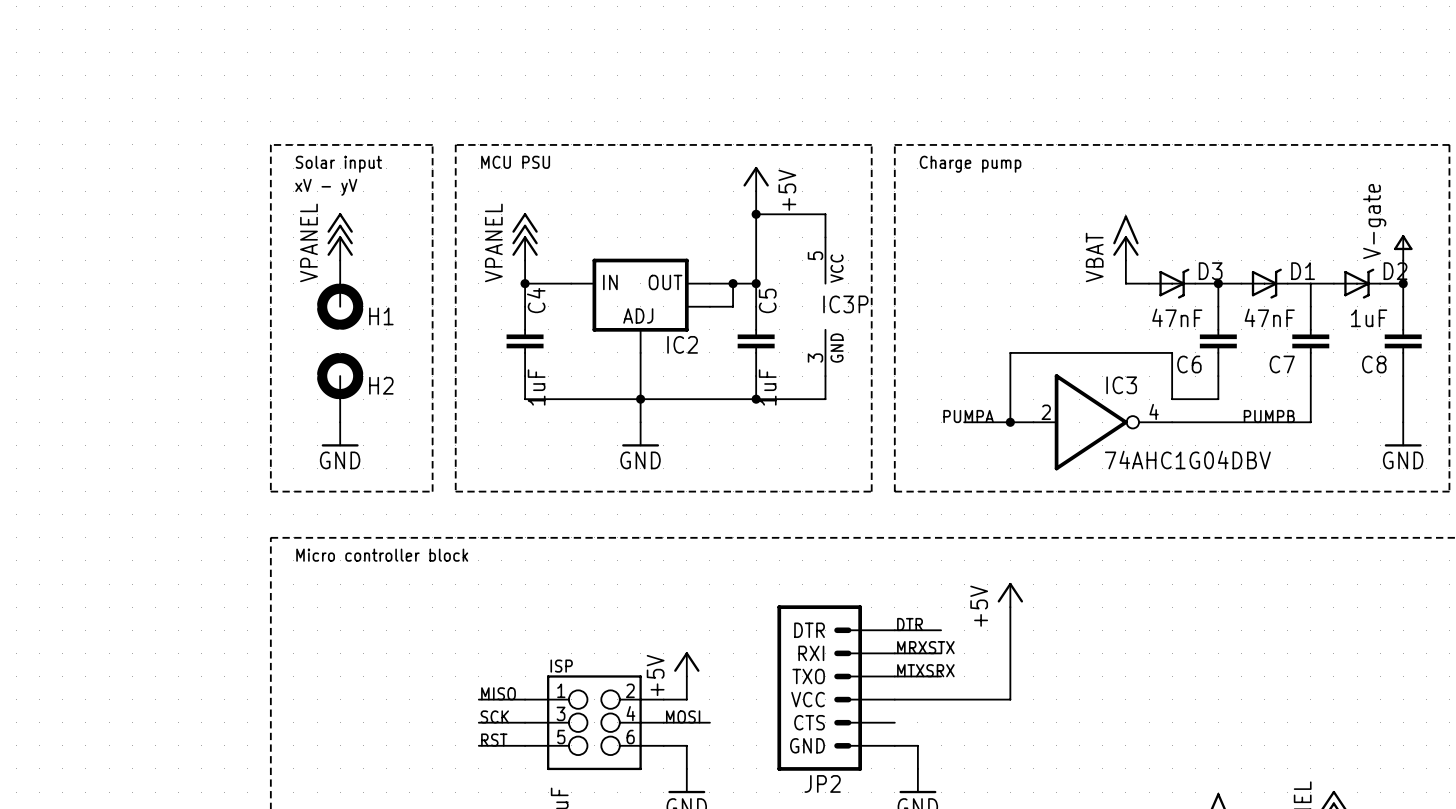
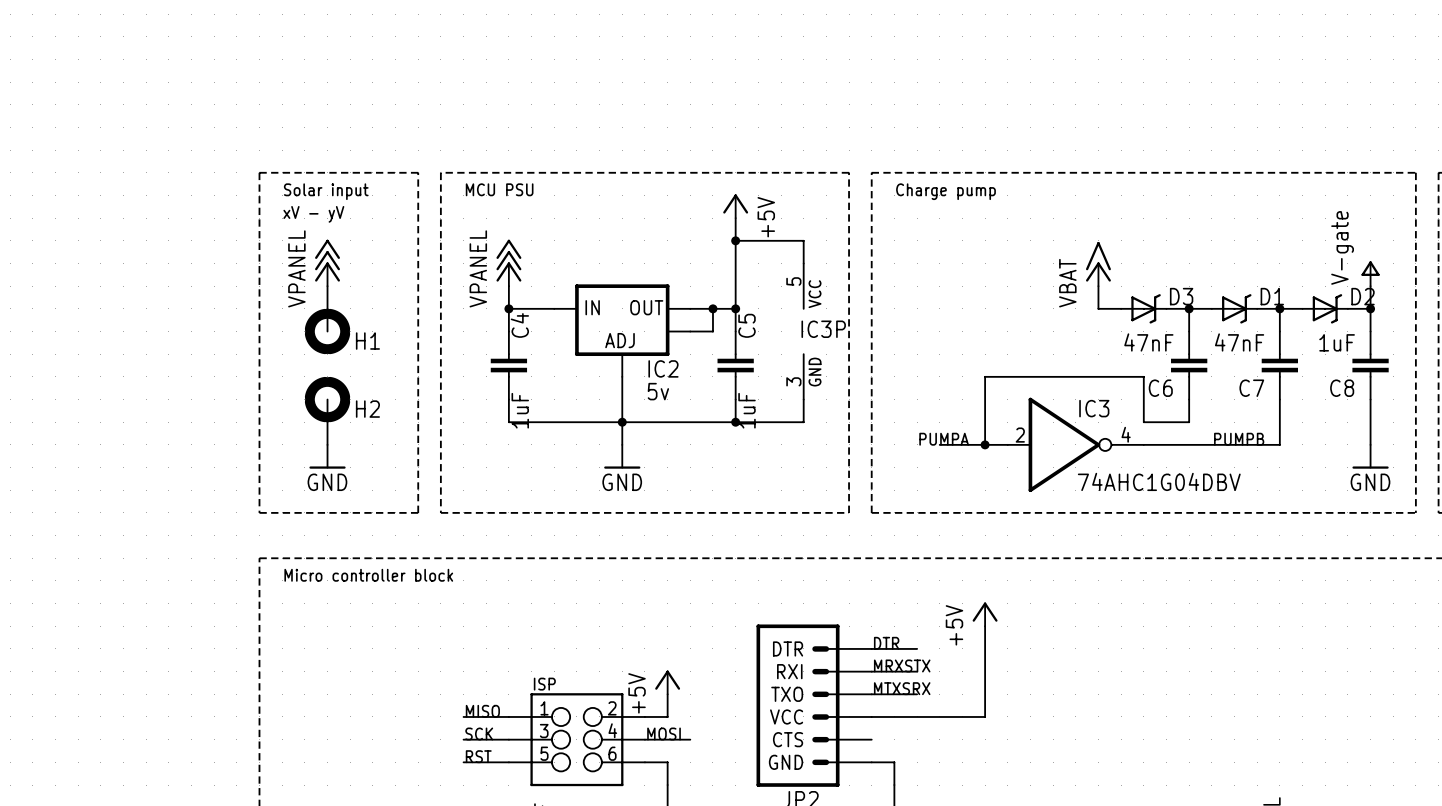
junction: none -> (1279, 308)
IC2 value: none -> 5v (658, 391)

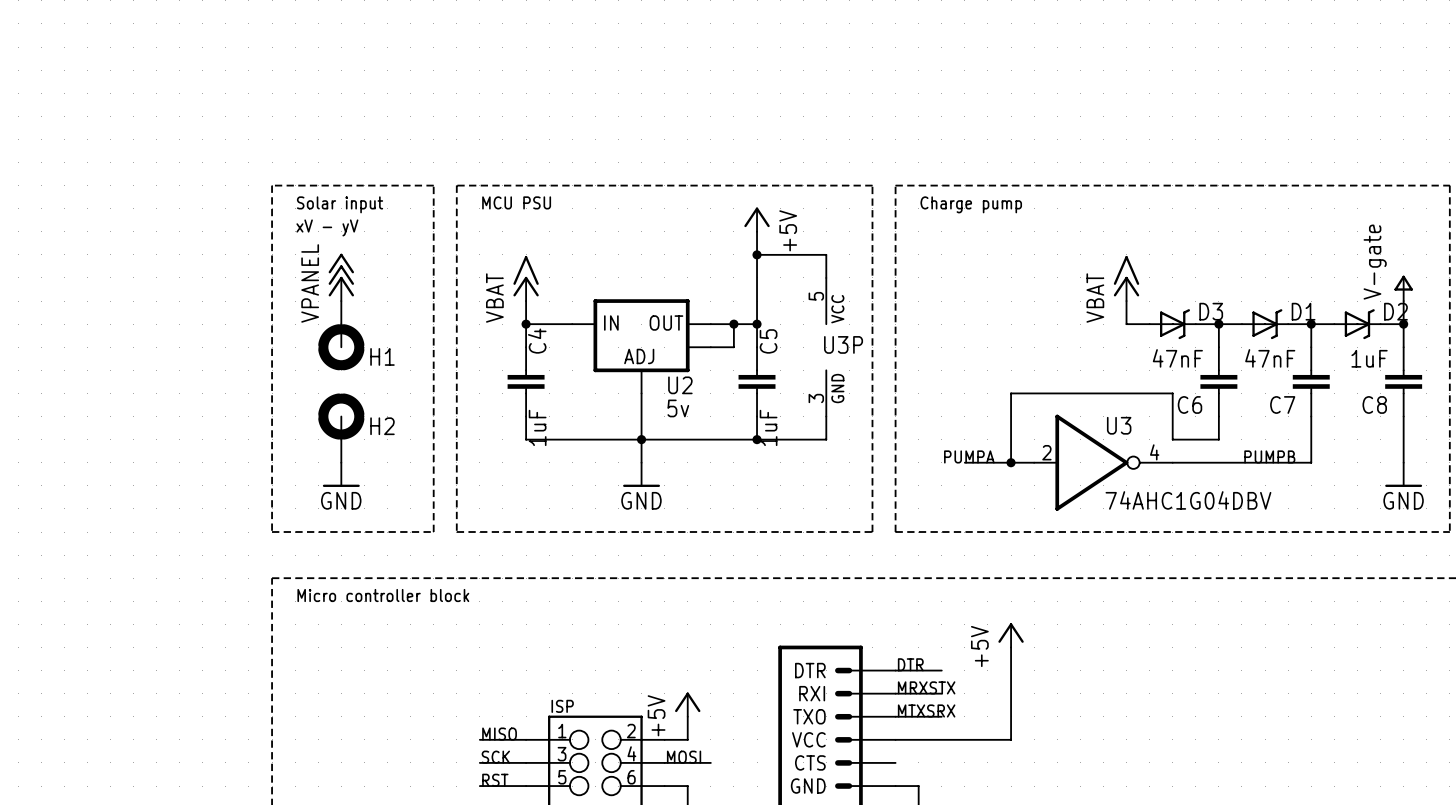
power symbol: VPANEL (508, 262) -> VBAT (526, 278)
IC3P name: IC3P (823, 329) -> U3P (843, 344)
IC2 name: IC2 (663, 368) -> U2 (680, 385)
IC3 name: IC3 (1094, 408) -> U3 (1119, 425)

